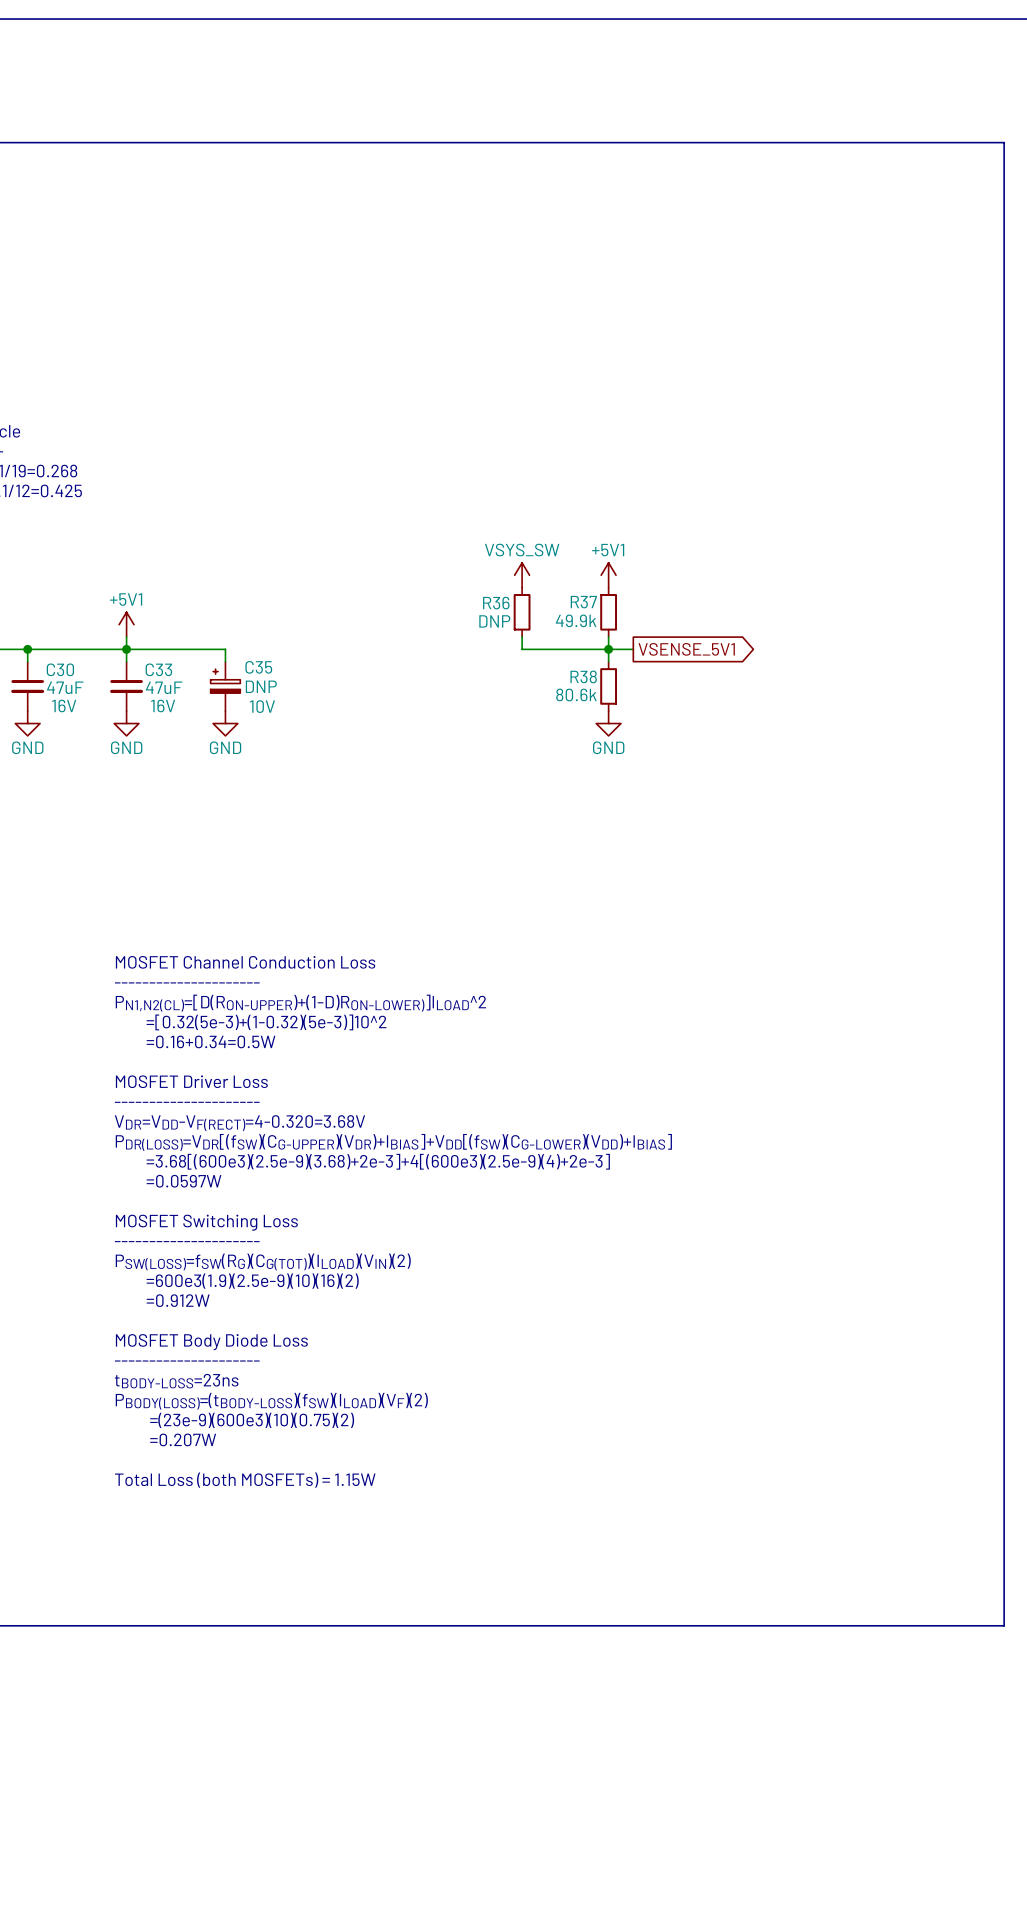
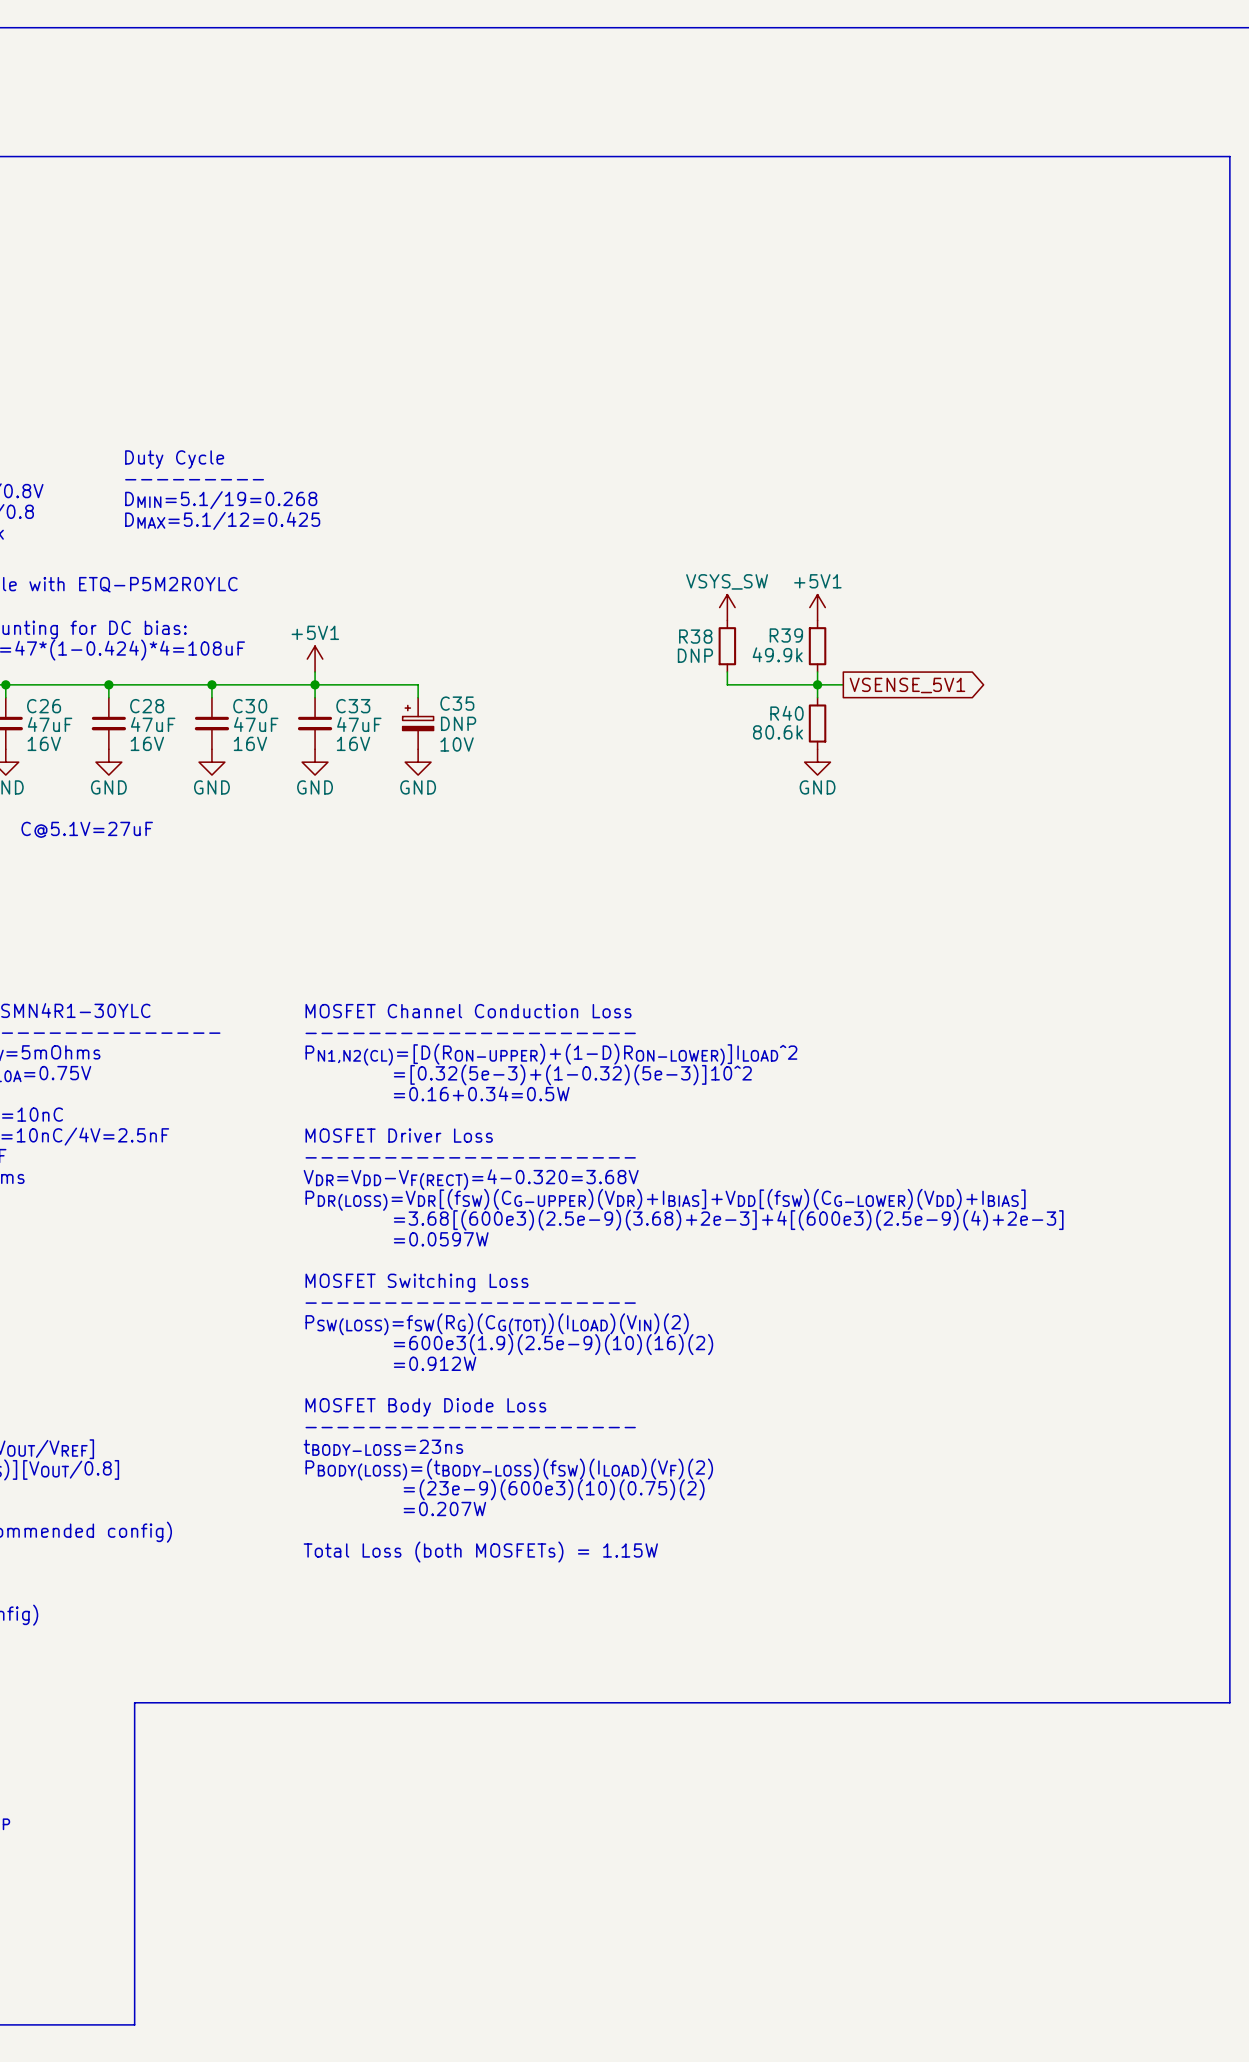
R37 name: R37 (583, 602) -> R39 (786, 635)
R36 name: R36 (496, 603) -> R38 (695, 636)
R38 name: R38 (583, 676) -> R40 (786, 713)

